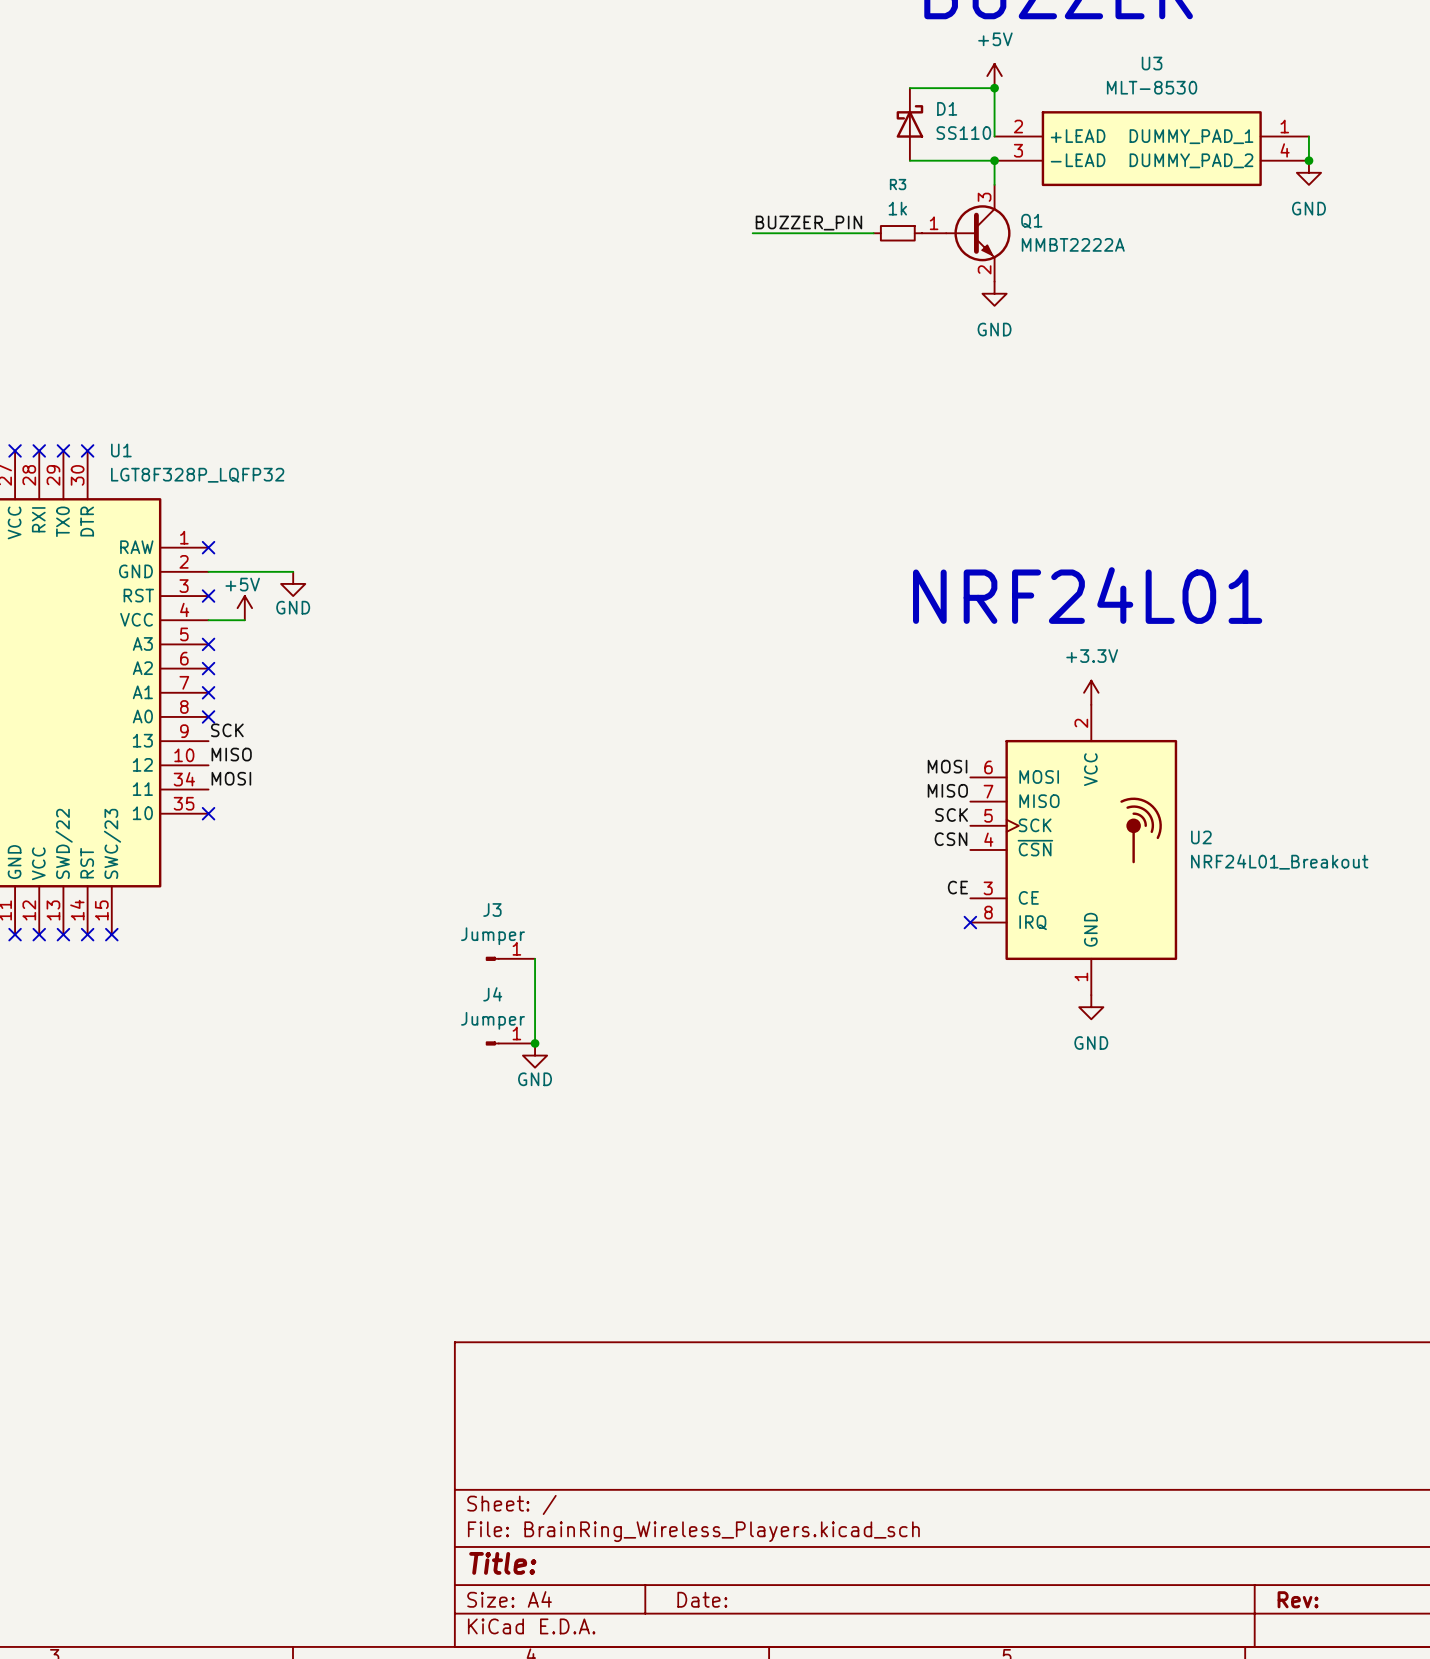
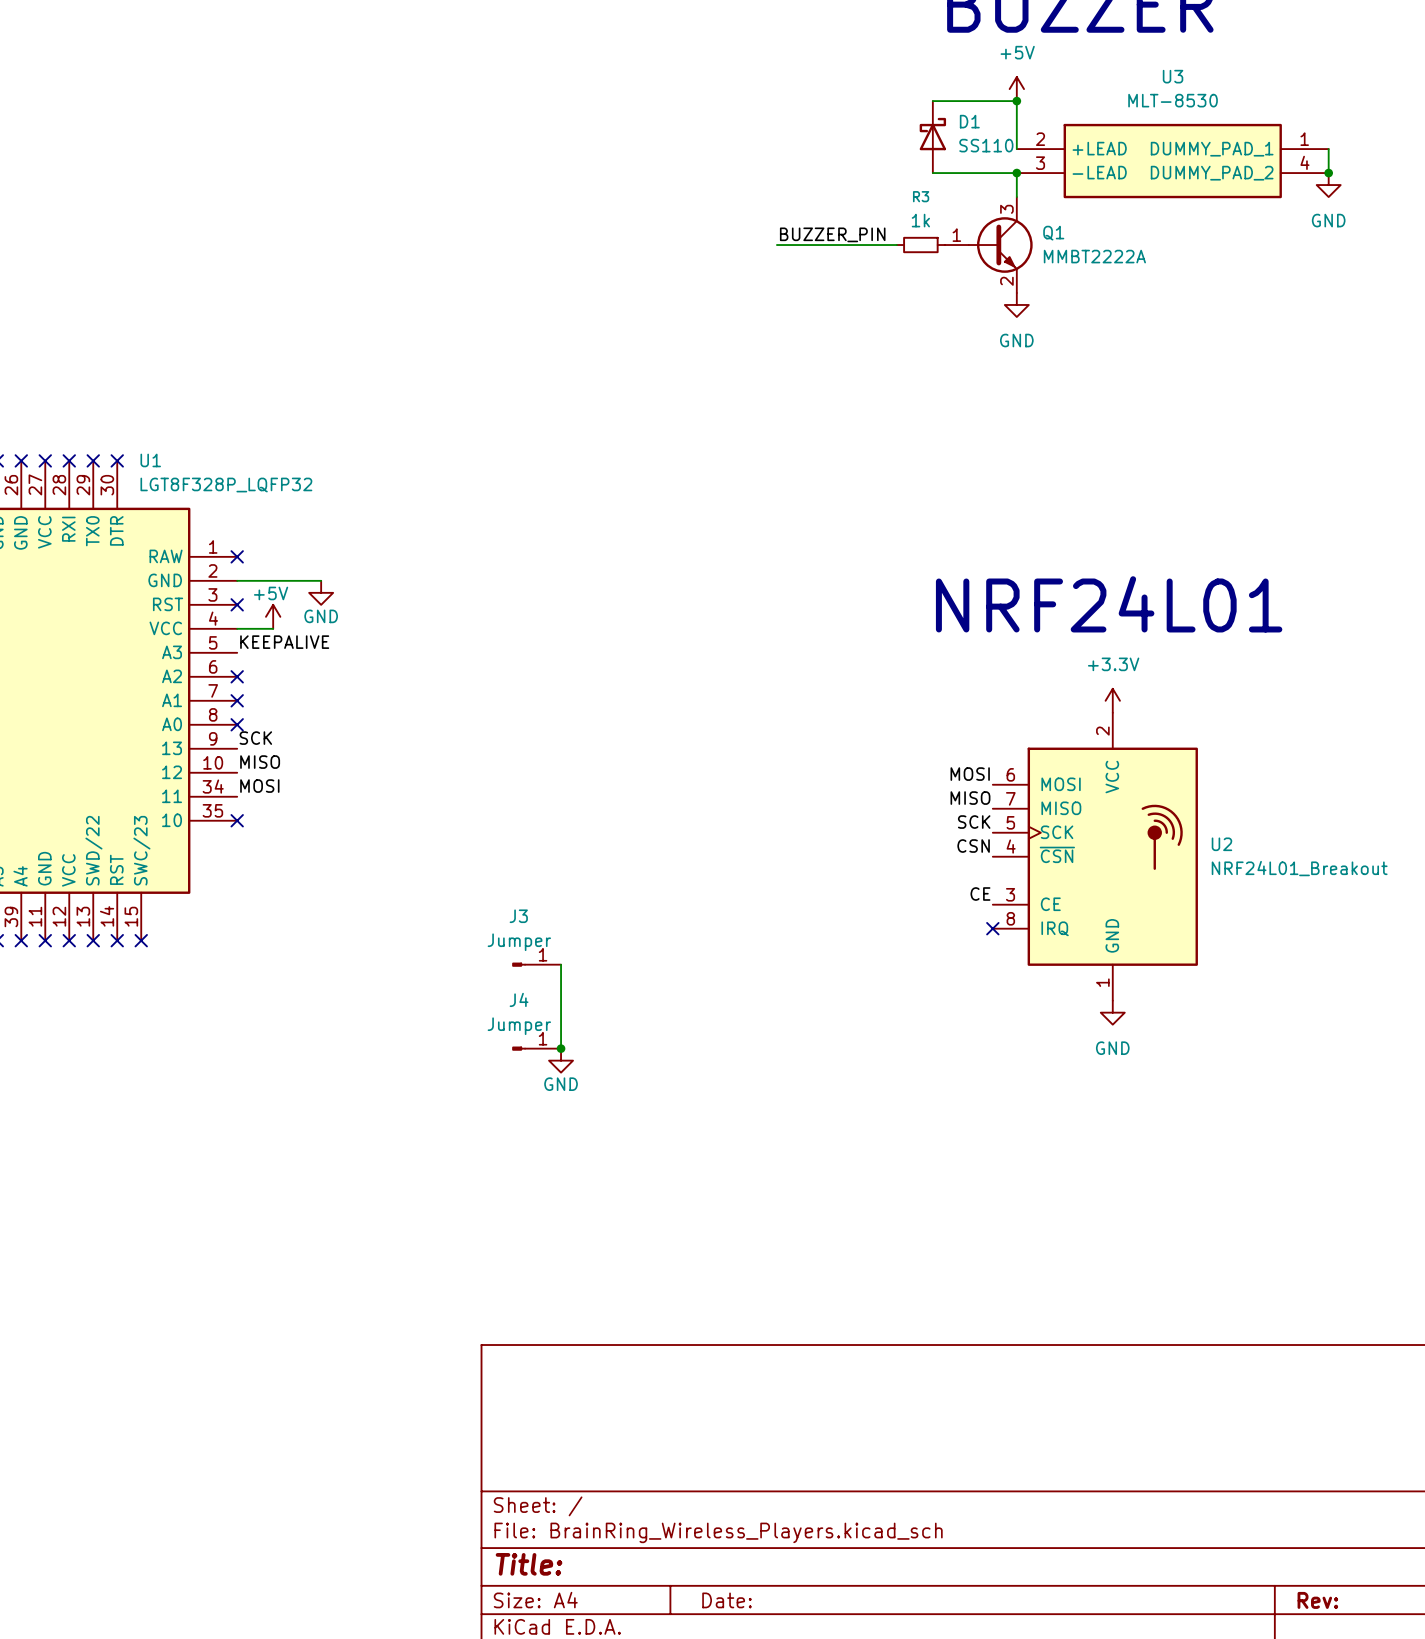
label: none -> KEEPALIVE (284, 642)
no-connect mark: (208, 644) -> none

